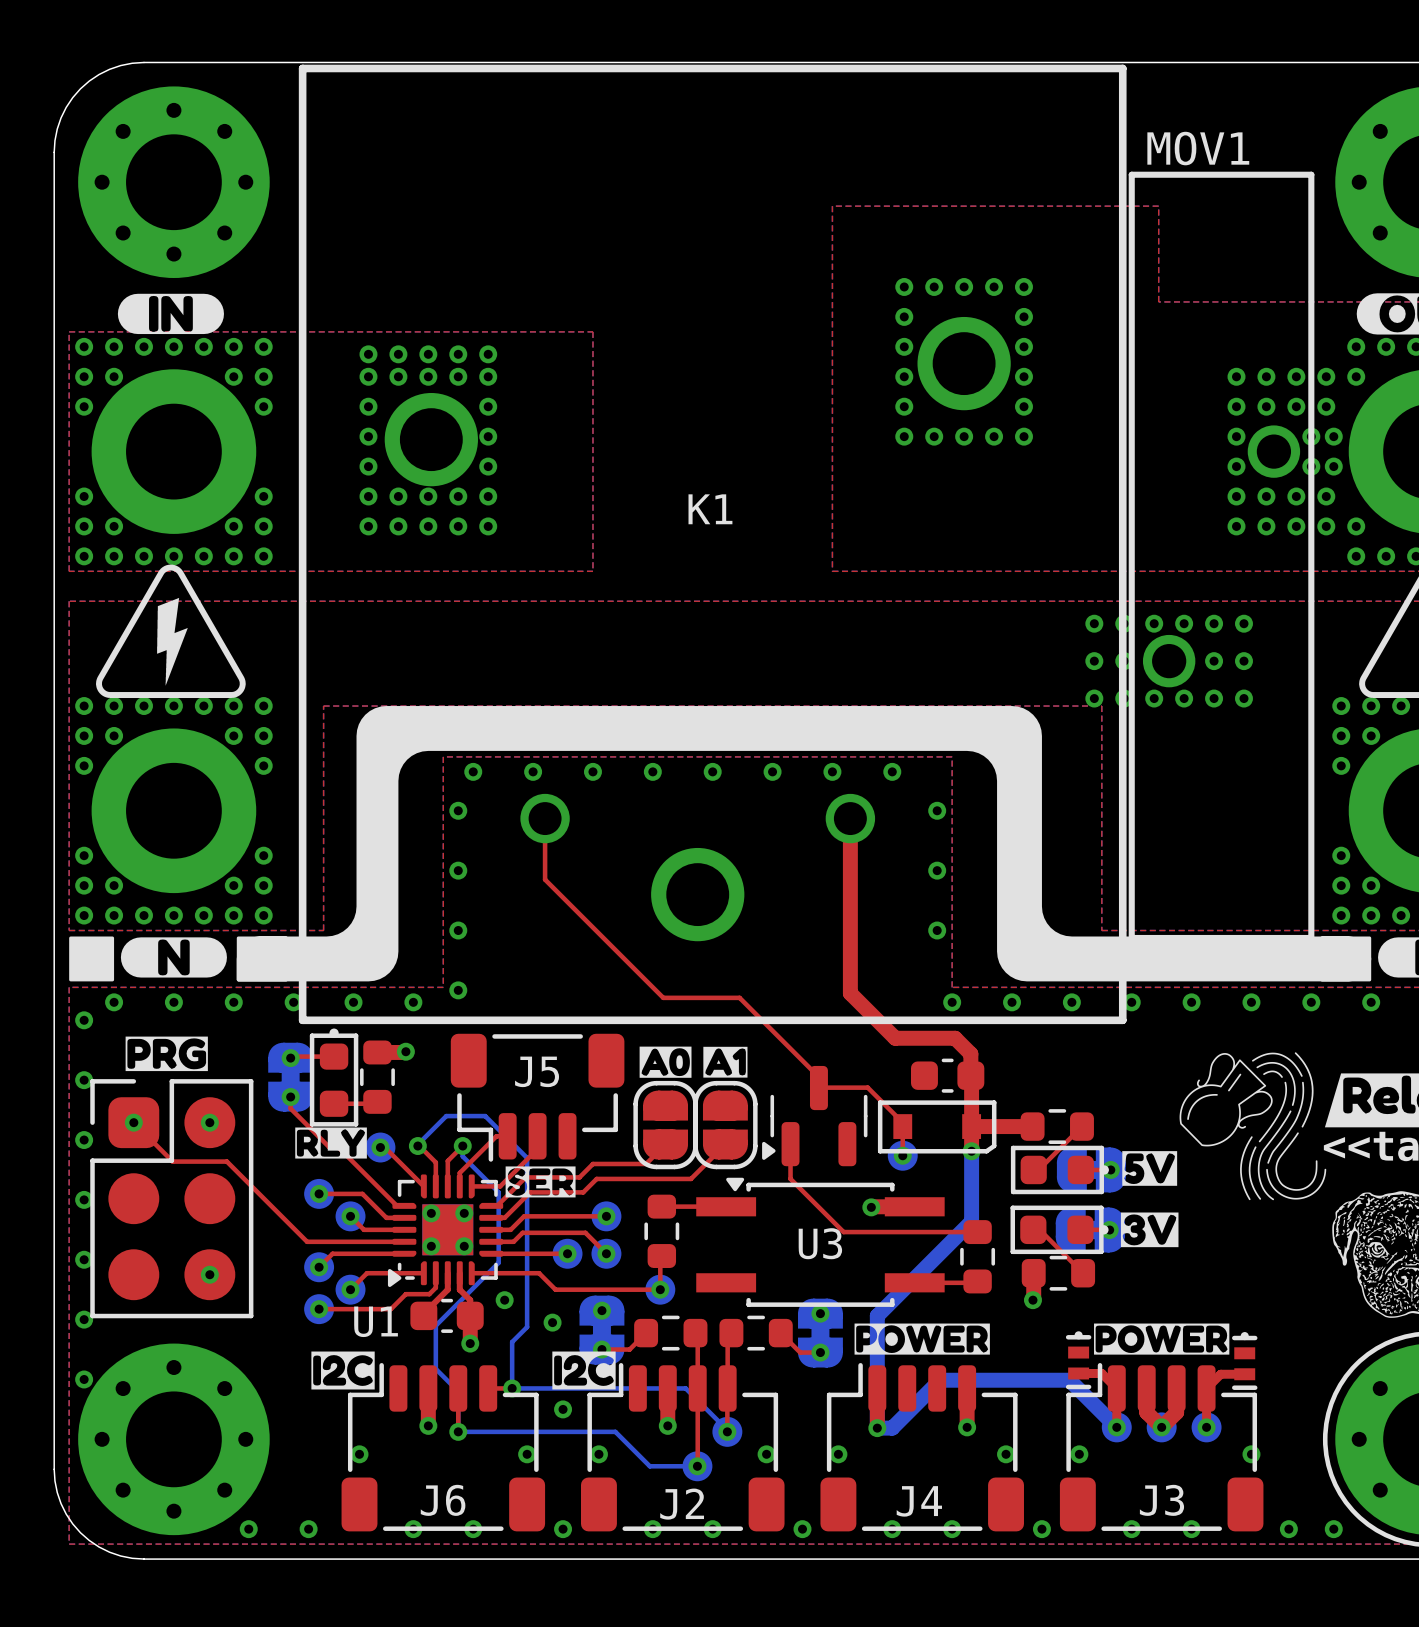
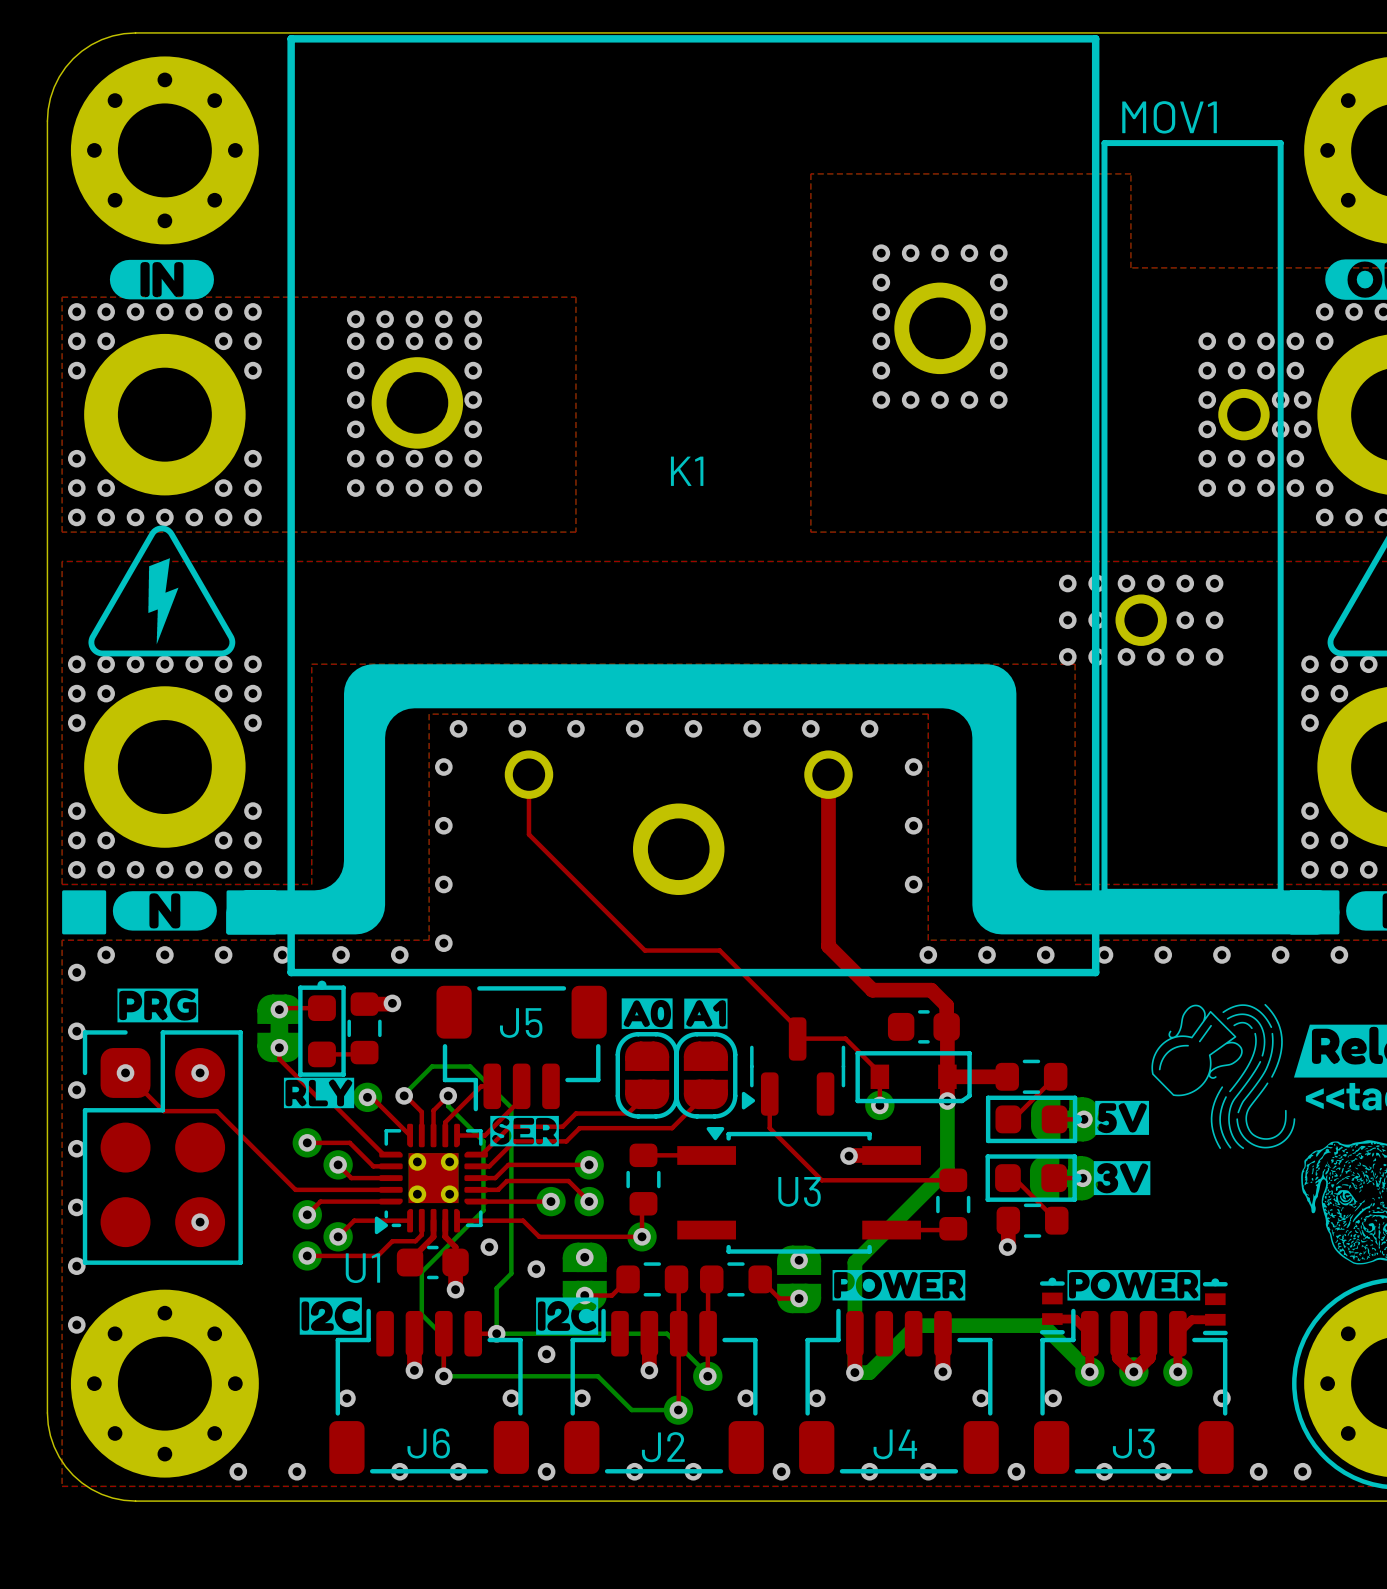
part footprint: [579, 1295, 625, 1365] -> [562, 1242, 607, 1311]
part footprint: [798, 1298, 843, 1368] -> [777, 1245, 822, 1314]

